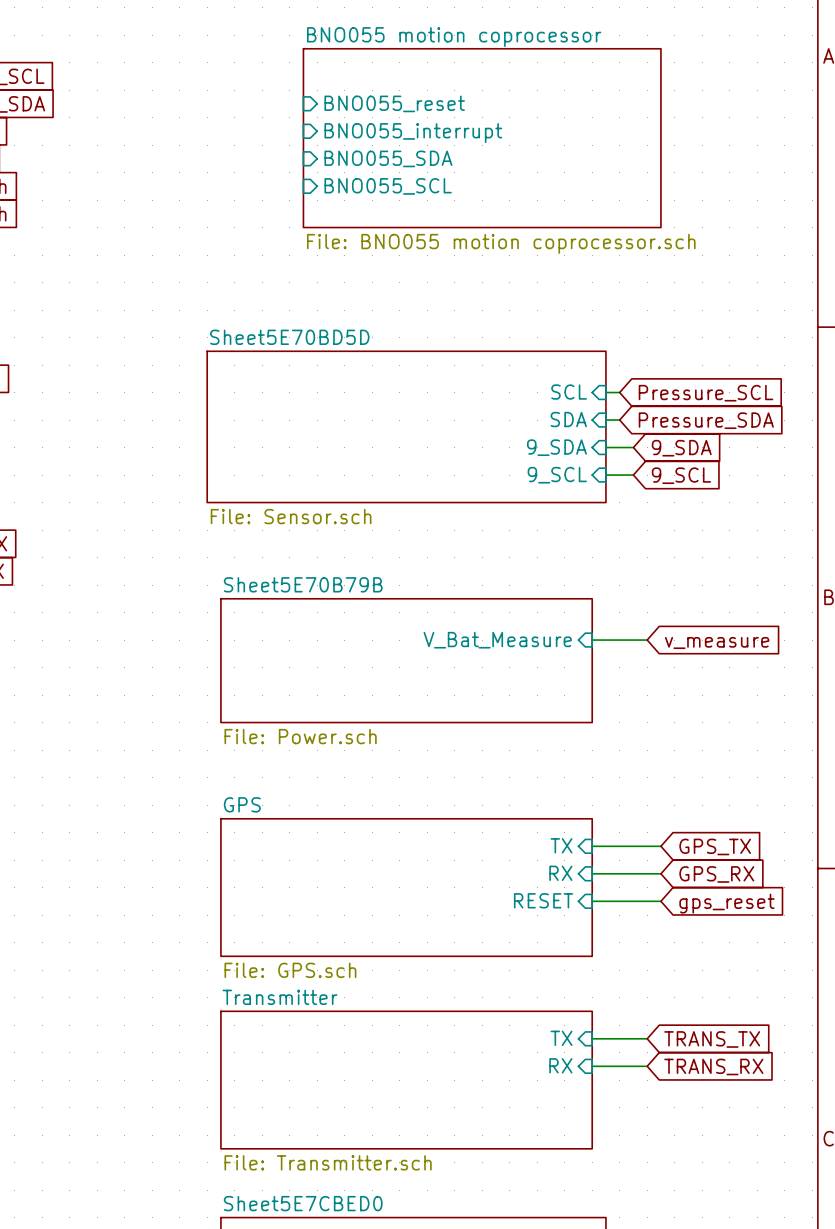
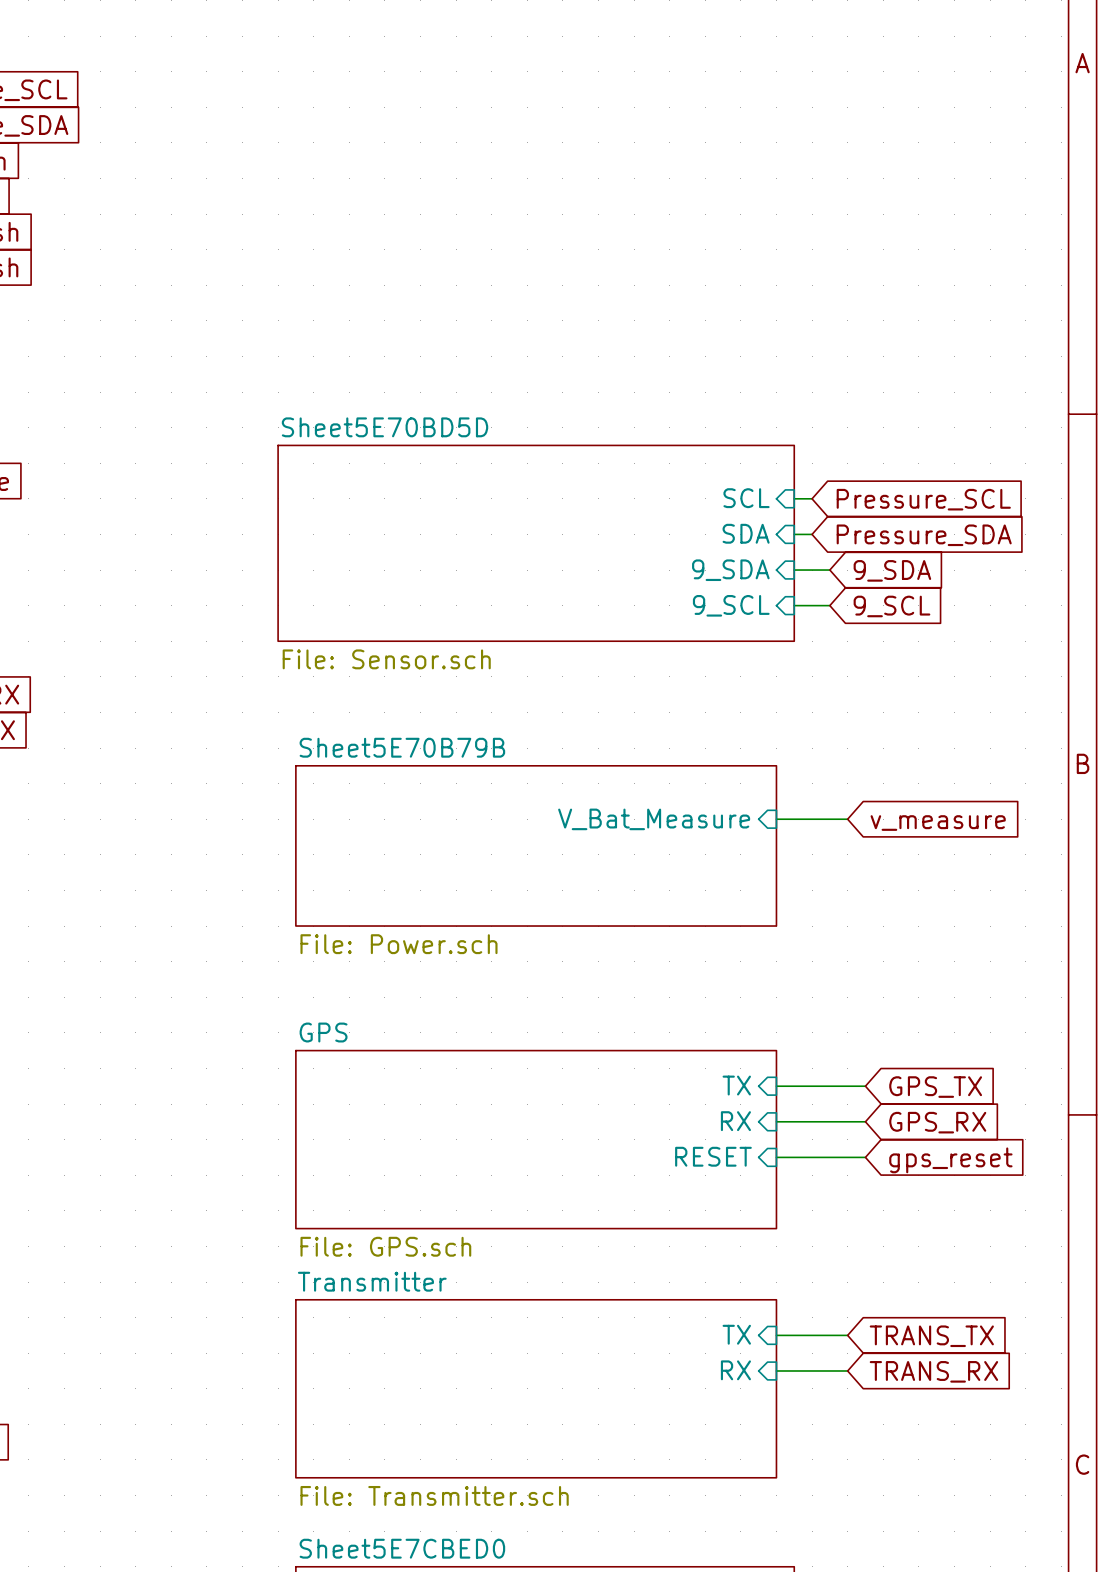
sheet pin: BNO055_reset (394, 103) -> none
sheet pin: BNO055_interrupt (413, 133) -> none
sheet BNO055 motion coprocessor: File: BNO055 motion coprocessor.sch (482, 138) -> none
sheet pin: BNO055_SDA (388, 158) -> none
sheet pin: BNO055_SCL (388, 186) -> none

